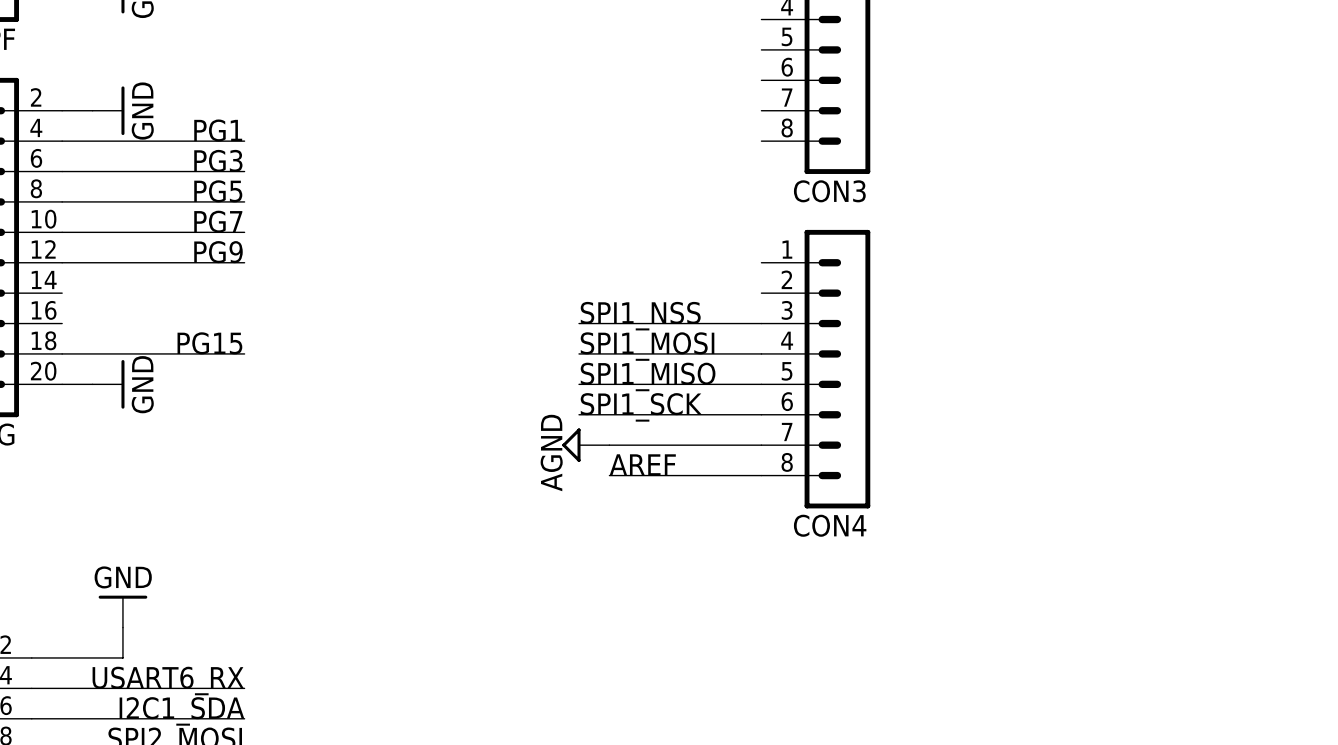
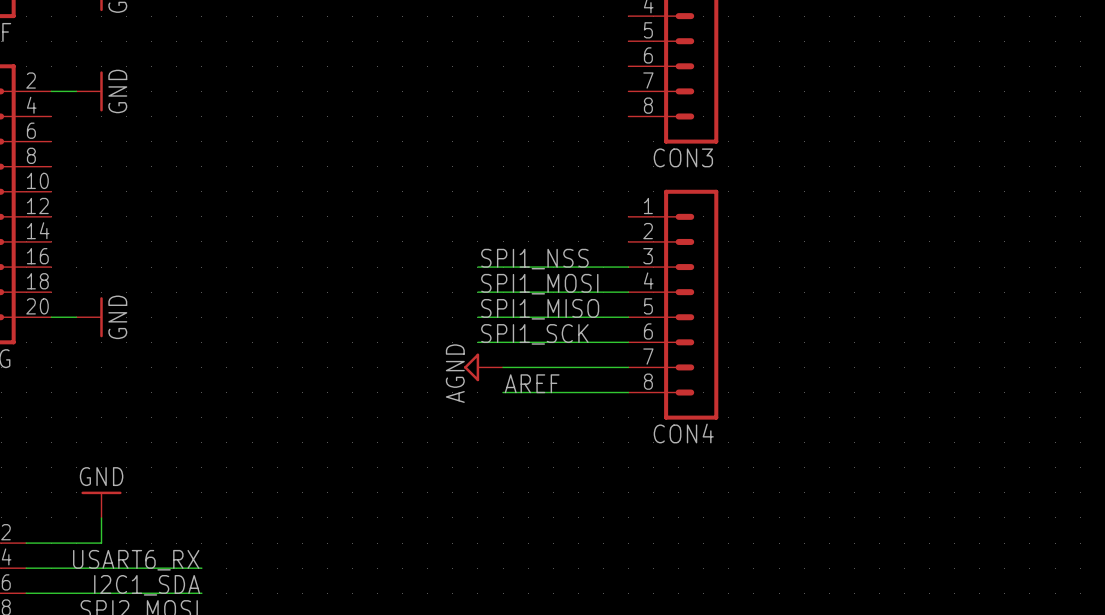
label: PG1 (218, 130) -> none
wire: (62, 141) (244, 141) -> none
label: PG3 (218, 160) -> none
wire: (62, 171) (244, 171) -> none
label: PG5 (218, 191) -> none
wire: (62, 201) (244, 201) -> none
label: PG7 (218, 221) -> none
wire: (62, 232) (244, 232) -> none
label: PG9 (218, 252) -> none
wire: (62, 262) (244, 262) -> none
label: PG15 (209, 343) -> none
wire: (62, 353) (244, 353) -> none

